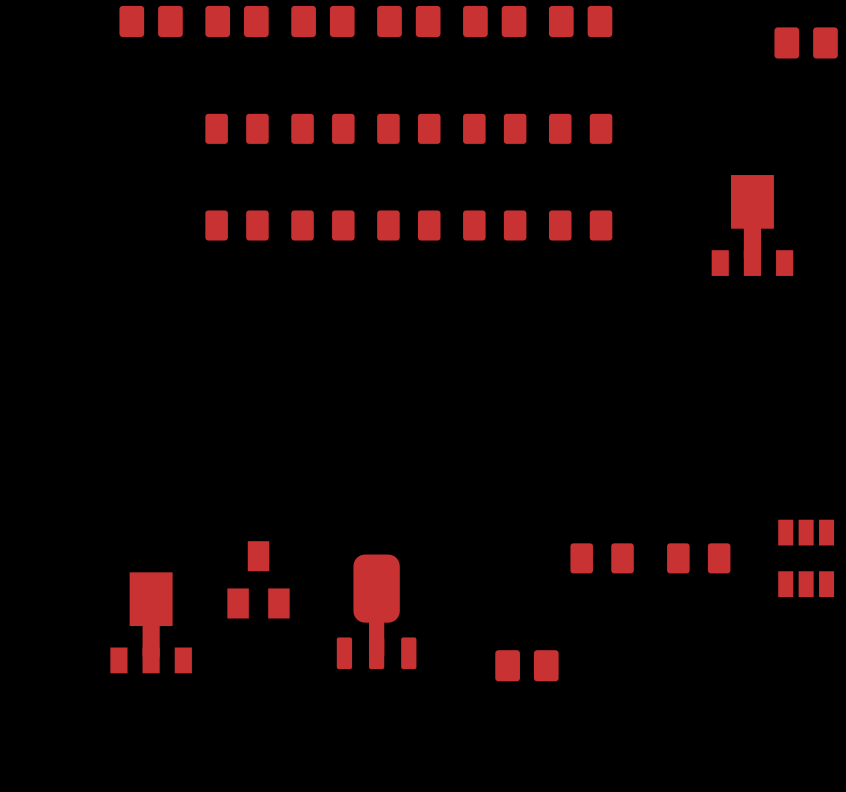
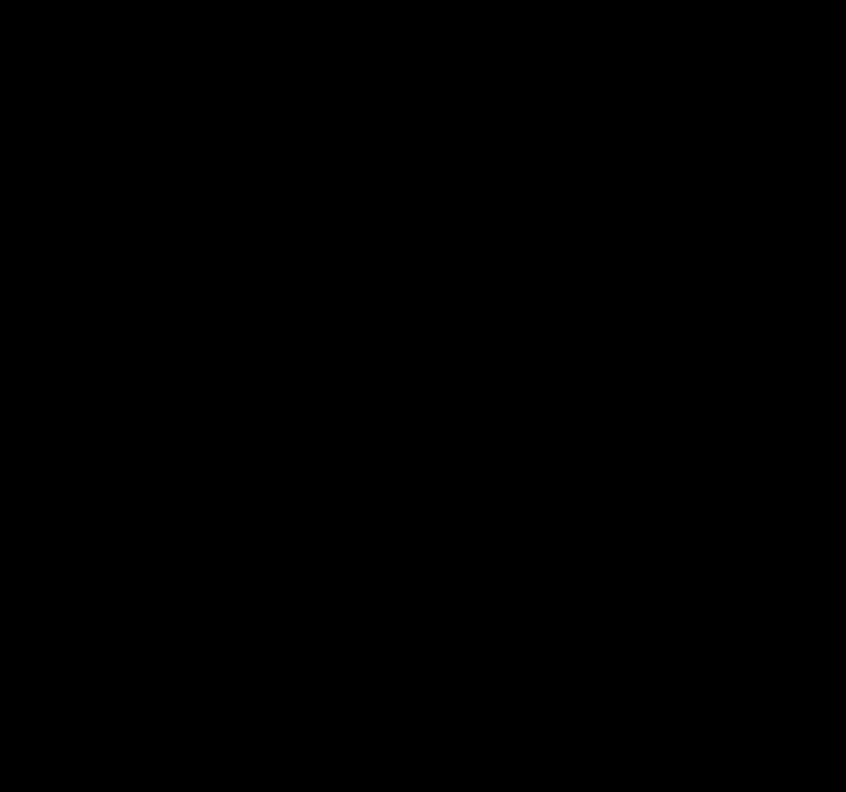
part: (151, 21) -> none
part: (237, 21) -> none
part: (322, 21) -> none
part: (408, 21) -> none
part: (494, 21) -> none
part: (580, 21) -> none
part: (806, 42) -> none
part: (237, 128) -> none
part: (322, 128) -> none
part: (408, 128) -> none
part: (494, 128) -> none
part: (580, 128) -> none
part: (237, 225) -> none
part: (322, 225) -> none
part: (408, 225) -> none
part: (494, 225) -> none
part: (580, 225) -> none
part: (752, 225) -> none
part: (602, 558) -> none
part: (698, 558) -> none
part: (806, 558) -> none
part: (258, 579) -> none
part: (376, 611) -> none
part: (151, 622) -> none
part: (526, 665) -> none

